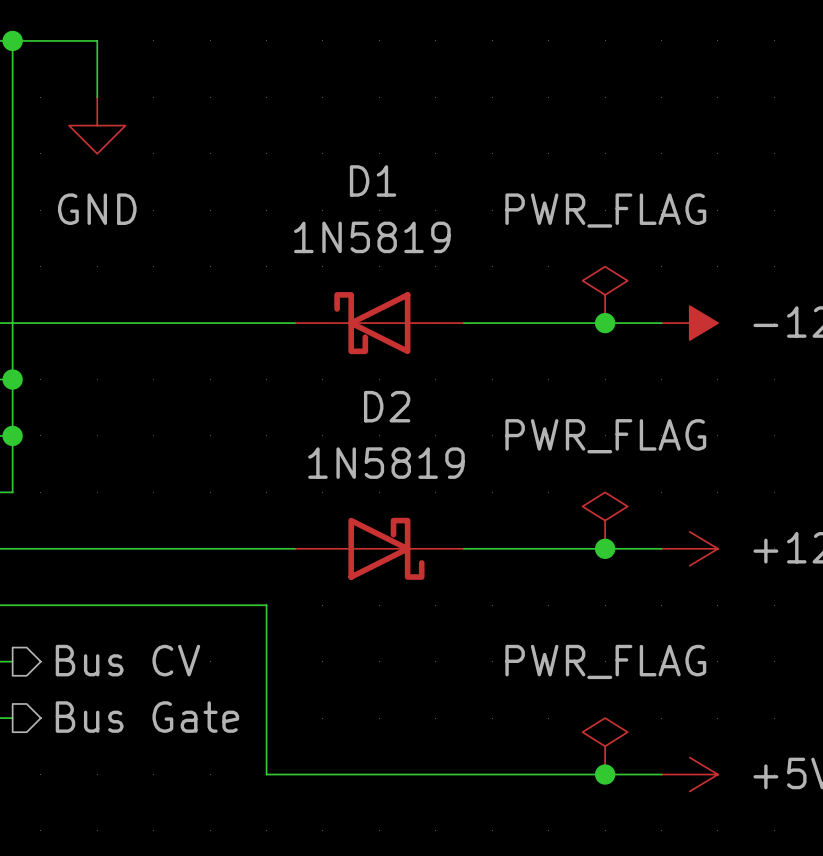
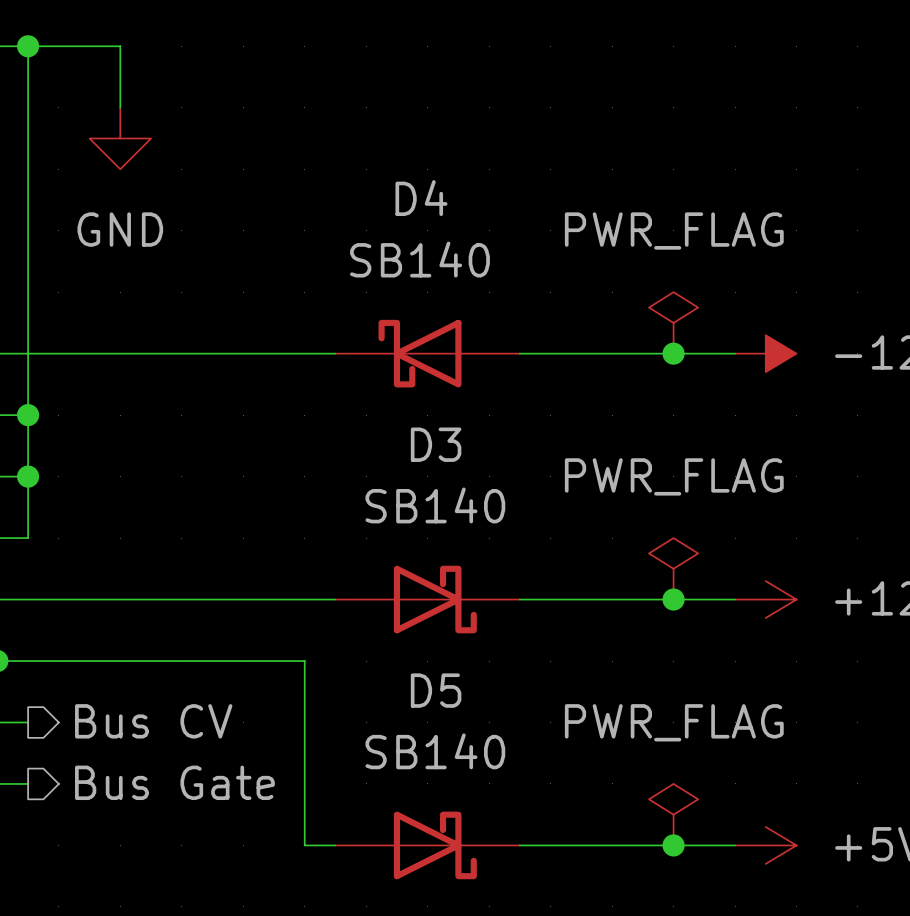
D1 name: D1 (373, 180) -> D4 (421, 198)
D1 value: 1N5819 (372, 237) -> SB140 (419, 259)
D2 name: D2 (387, 406) -> D3 (436, 444)
D2 value: 1N5819 (386, 463) -> SB140 (435, 505)
D5: none -> SB140 (427, 845)

